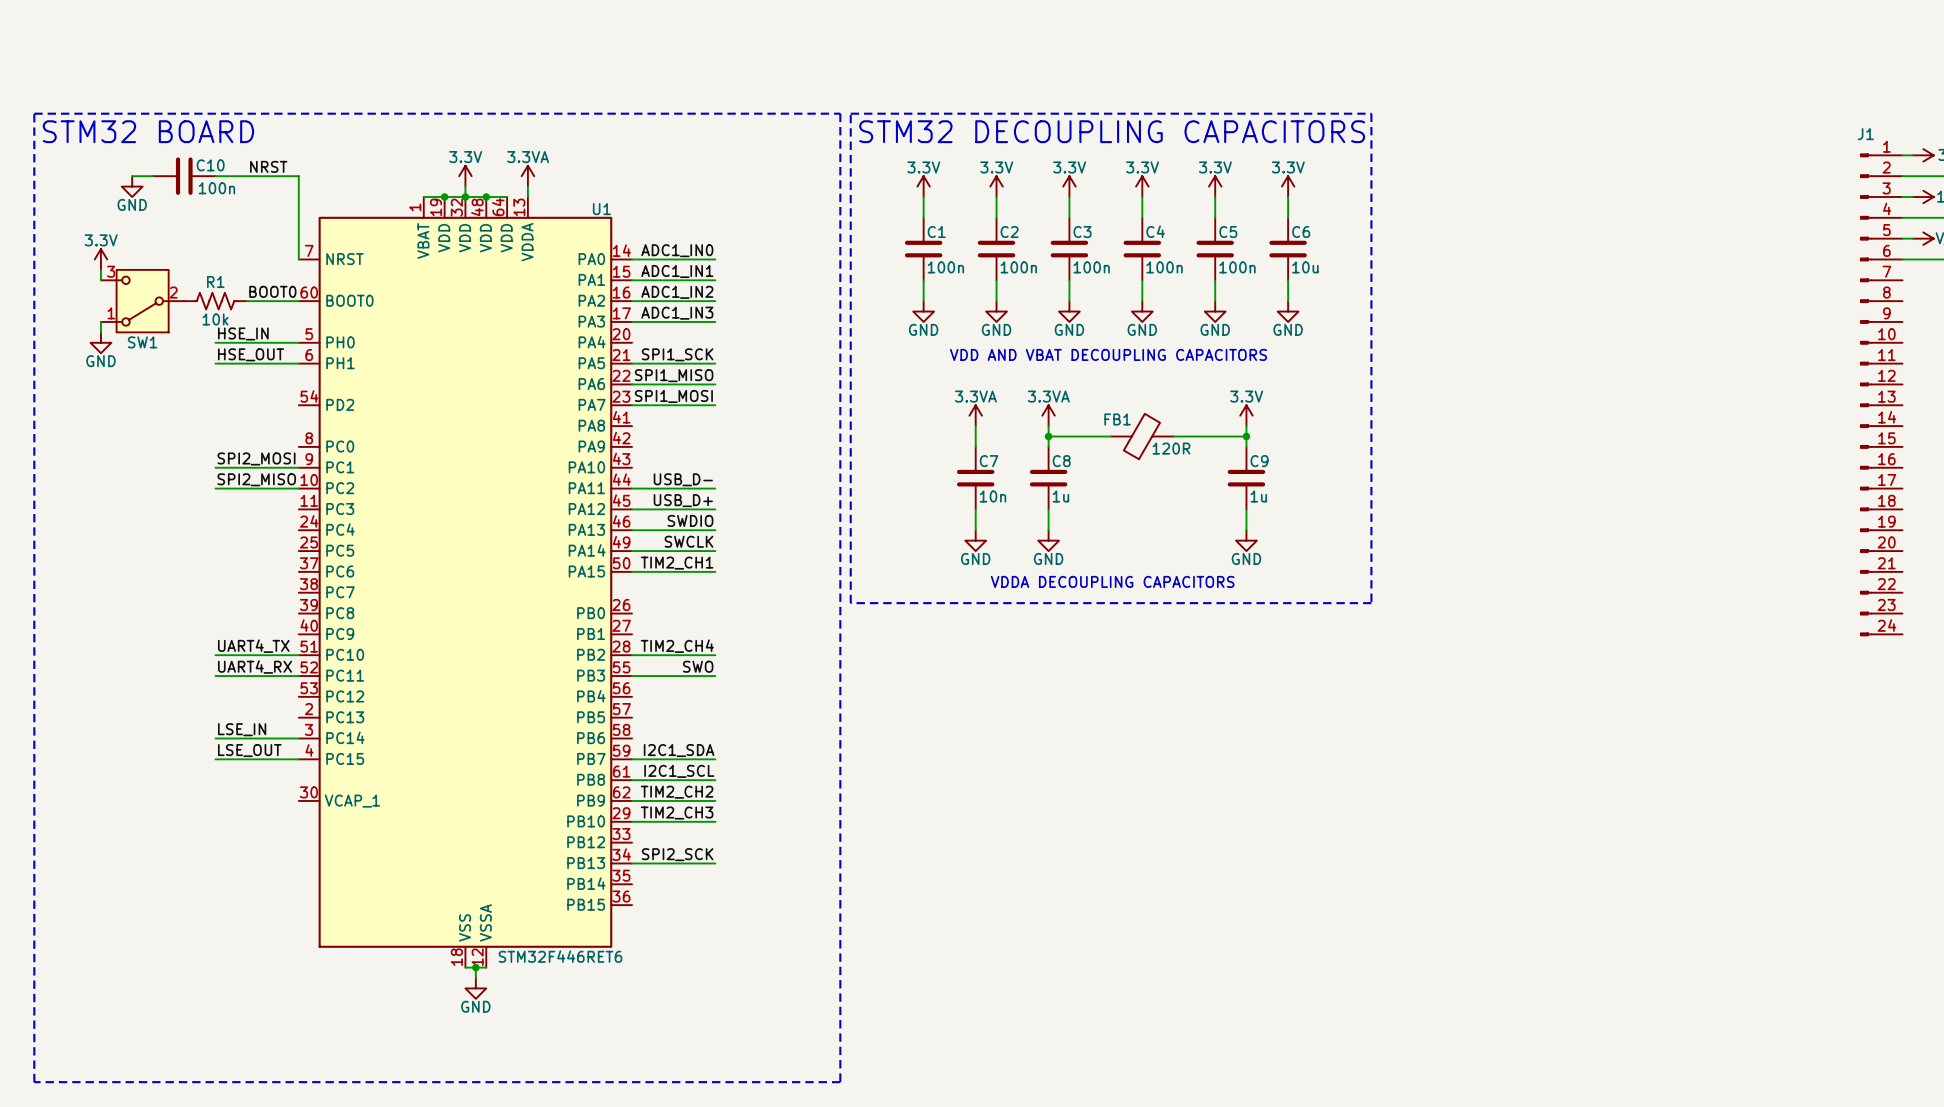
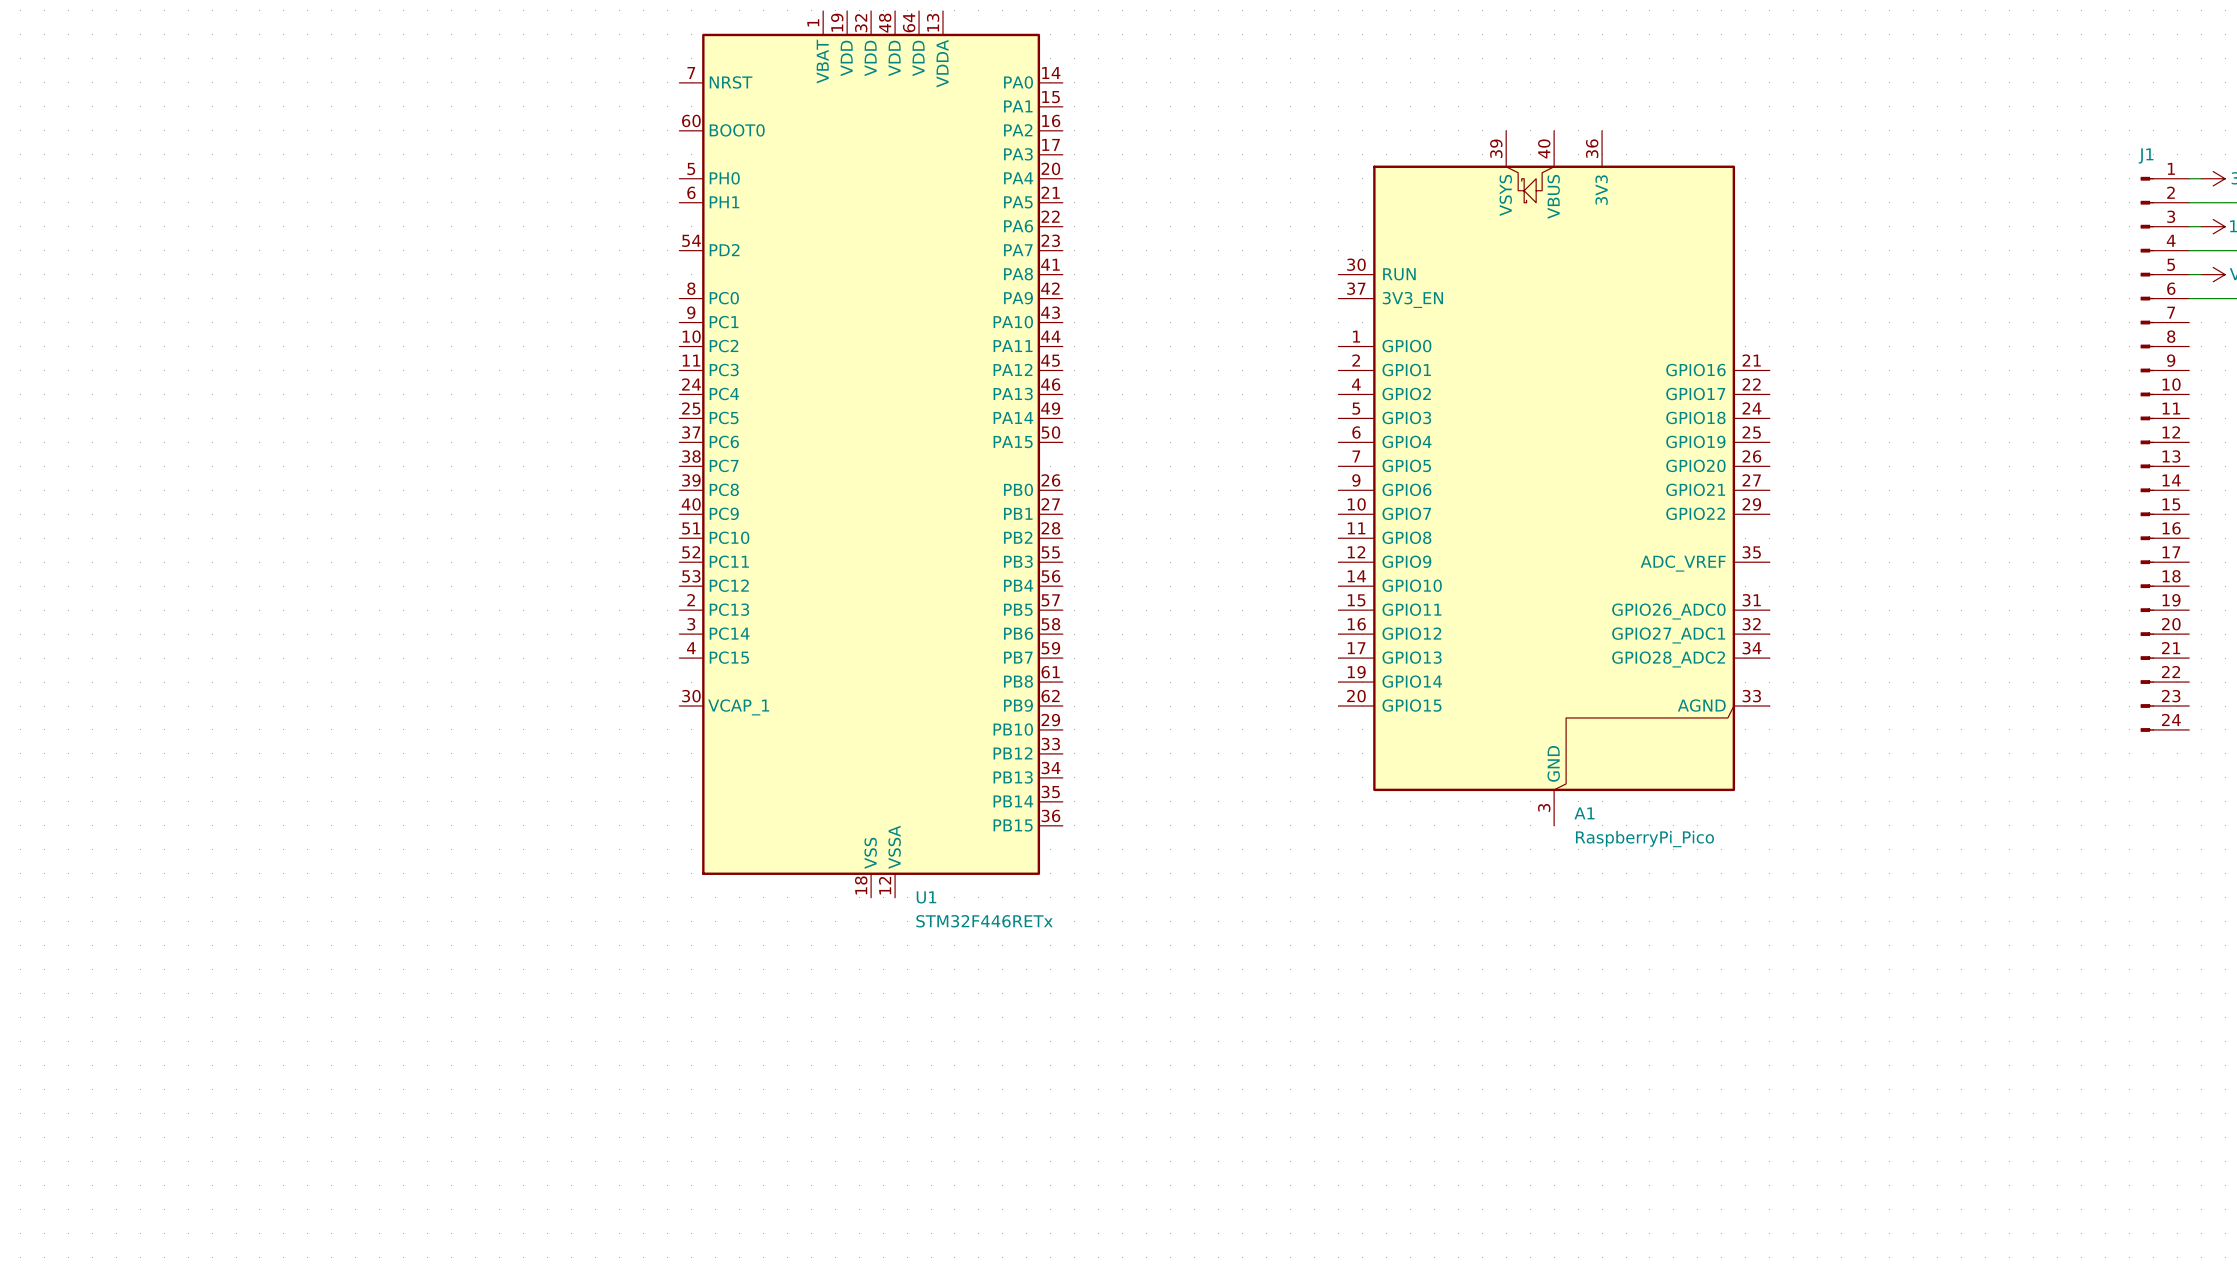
line: (34, 113) (840, 113) (840, 1082) (34, 1082) (34, 113) -> none
line: (850, 113) (1371, 113) (1371, 603) (850, 603) (850, 113) -> none
text: STM32 BOARD (148, 131) -> none
text: STM32 DECOUPLING CAPACITORS (1112, 131) -> none
label: NRST (268, 166) -> none
wire: (132, 176) (153, 176) -> none
C10: 100n (184, 176) -> none
wire: (215, 176) (298, 176) (298, 259) -> none
power symbol: 3.3V (465, 176) -> none
power symbol: 3.3VA (527, 176) -> none
power symbol: GND (132, 186) -> none
wire: (465, 186) (465, 197) -> none
wire: (527, 186) (527, 197) -> none
power symbol: 3.3V (923, 186) -> none
power symbol: 3.3V (996, 186) -> none
power symbol: 3.3V (1069, 186) -> none
power symbol: 3.3V (1142, 186) -> none
power symbol: 3.3V (1215, 186) -> none
power symbol: 3.3V (1288, 186) -> none
wire: (423, 197) (507, 197) -> none
junction: (444, 197) -> none
junction: (465, 197) -> none
junction: (486, 197) -> none
wire: (923, 197) (923, 217) -> none
wire: (996, 197) (996, 217) -> none
wire: (1069, 197) (1069, 217) -> none
wire: (1142, 197) (1142, 217) -> none
U1 name position: U1 (601, 209) -> U1 (926, 897)
C1: 100n (923, 249) -> none
C2: 100n (996, 249) -> none
C3: 100n (1069, 249) -> none
C4: 100n (1142, 249) -> none
C5: 100n (1215, 249) -> none
C6: 10u (1288, 249) -> none
label: ADC1_IN0 (677, 250) -> none
power symbol: 3.3V (100, 259) -> none
wire: (100, 269) (100, 280) -> none
label: ADC1_IN1 (677, 271) -> none
wire: (923, 280) (923, 301) -> none
wire: (996, 280) (996, 301) -> none
wire: (1069, 280) (1069, 301) -> none
wire: (1142, 280) (1142, 301) -> none
label: BOOT0 (272, 291) -> none
label: ADC1_IN2 (677, 292) -> none
SW1: (142, 301) -> none
R1: 10k (215, 301) -> none
wire: (246, 301) (298, 301) -> none
power symbol: GND (923, 311) -> none
power symbol: GND (996, 311) -> none
power symbol: GND (1069, 311) -> none
power symbol: GND (1142, 311) -> none
power symbol: GND (1215, 311) -> none
power symbol: GND (1288, 311) -> none
label: ADC1_IN3 (677, 313) -> none
wire: (100, 321) (100, 332) -> none
label: HSE_IN (243, 333) -> none
power symbol: GND (100, 342) -> none
wire: (215, 342) (298, 342) -> none
label: HSE_OUT (251, 354) -> none
label: SPI1_SCK (677, 354) -> none
text: VDD AND VBAT DECOUPLING CAPACITORS (1108, 354) -> none
wire: (215, 363) (298, 363) -> none
label: SPI1_MISO (674, 375) -> none
label: SPI1_MOSI (673, 396) -> none
power symbol: 3.3VA (975, 415) -> none
power symbol: 3.3VA (1048, 415) -> none
power symbol: 3.3V (1246, 415) -> none
A1: none -> RaspberryPi_Pico (1554, 478)
wire: (975, 426) (975, 446) -> none
wire: (1048, 426) (1048, 446) -> none
wire: (1048, 436) (1111, 436) -> none
junction: (1048, 436) -> none
FB1: 120R (1142, 436) -> none
junction: (1246, 436) -> none
label: SPI2_MOSI (256, 458) -> none
wire: (215, 467) (298, 467) -> none
C7: 10n (975, 478) -> none
C8: 1u (1048, 478) -> none
C9: 1u (1246, 478) -> none
label: SPI2_MISO (256, 479) -> none
label: USB_D- (683, 479) -> none
wire: (215, 488) (298, 488) -> none
label: USB_D+ (683, 500) -> none
wire: (975, 509) (975, 530) -> none
wire: (1048, 509) (1048, 530) -> none
label: SWDIO (690, 520) -> none
power symbol: GND (975, 540) -> none
power symbol: GND (1048, 540) -> none
power symbol: GND (1246, 540) -> none
label: SWCLK (689, 541) -> none
label: TIM2_CH1 (677, 563) -> none
text: VDDA DECOUPLING CAPACITORS (1112, 581) -> none
U1 position: (465, 582) -> (871, 454)
label: UART4_TX (253, 646) -> none
label: TIM2_CH4 (677, 646) -> none
wire: (215, 655) (298, 655) -> none
label: UART4_RX (255, 666) -> none
label: SWO (698, 666) -> none
wire: (215, 676) (298, 676) -> none
label: LSE_IN (242, 729) -> none
wire: (215, 738) (298, 738) -> none
label: LSE_OUT (249, 750) -> none
label: I2C1_SDA (679, 750) -> none
wire: (215, 759) (298, 759) -> none
label: I2C1_SCL (679, 771) -> none
wire: (632, 780) (715, 780) -> none
label: TIM2_CH2 (677, 792) -> none
wire: (632, 800) (715, 800) -> none
label: TIM2_CH3 (677, 813) -> none
wire: (632, 821) (715, 821) -> none
label: SPI2_SCK (677, 854) -> none
wire: (632, 863) (715, 863) -> none
U1 value: STM32F446RET6 (560, 956) -> STM32F446RETx (984, 921)
wire: (465, 967) (486, 967) -> none
wire: (475, 967) (475, 978) -> none
junction: (475, 967) -> none
power symbol: GND (475, 988) -> none

